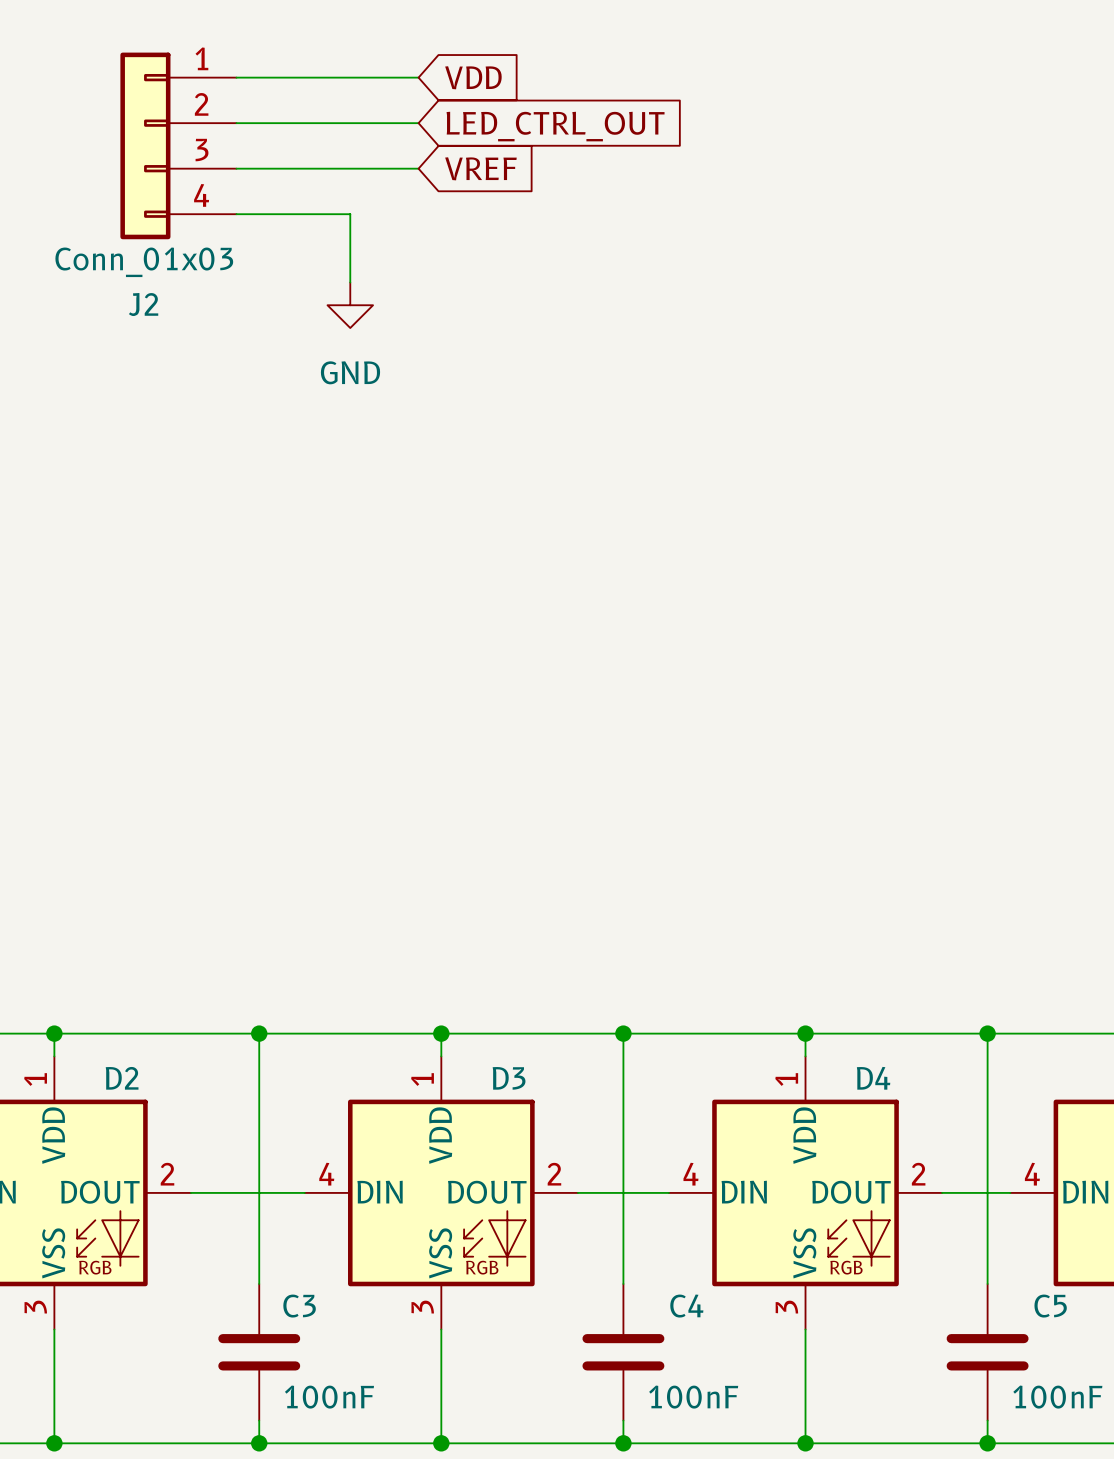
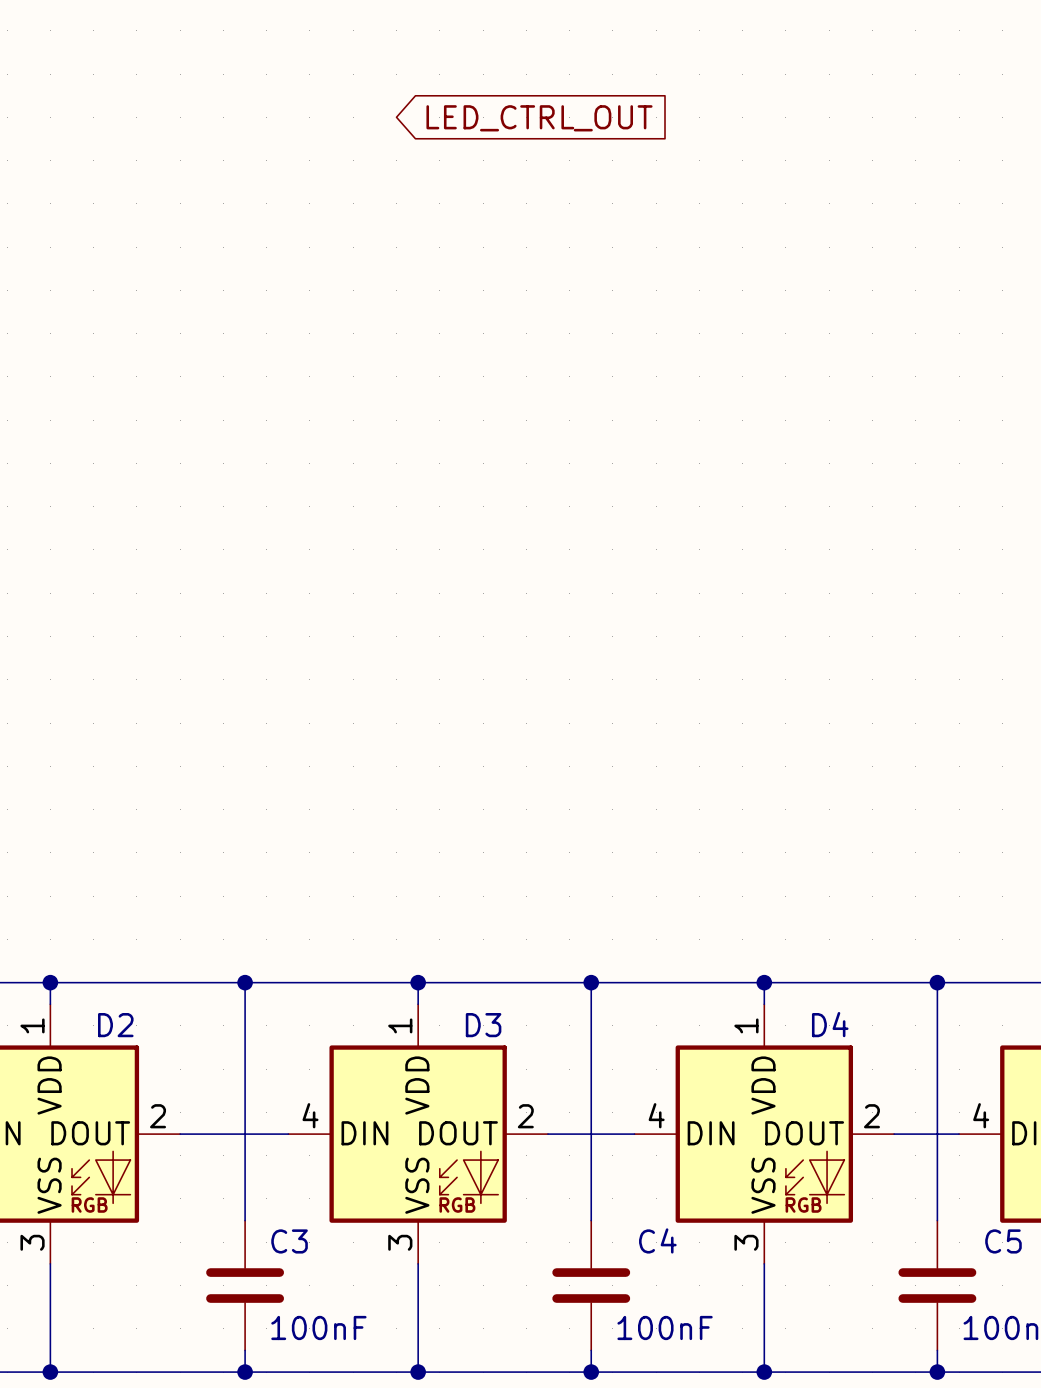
wire: (236, 77) (418, 77) -> none
global label: VDD (473, 77) -> none
wire: (236, 123) (418, 123) -> none
J2: Conn_01x03 (178, 145) -> none
wire: (236, 168) (418, 168) -> none
global label: VREF (480, 168) -> none
wire: (236, 214) (350, 214) (350, 282) -> none
power symbol: GND (350, 305) -> none

